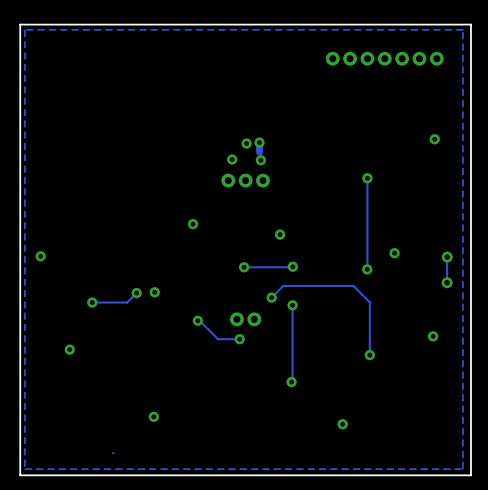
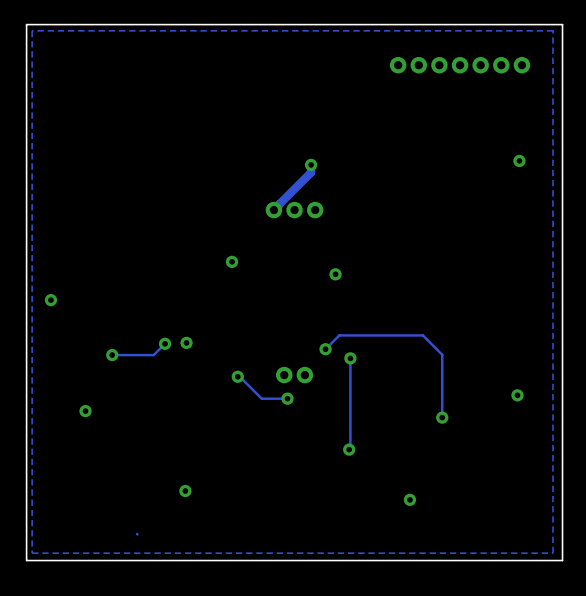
via: (246, 143) -> none
track: (259, 149) (259, 152) -> (311, 172) (273, 210)
via: (232, 159) -> none
via: (260, 160) -> none
track: (367, 178) (367, 269) -> none
via: (367, 178) -> none
via: (394, 253) -> none
track: (447, 257) (447, 282) -> none
via: (447, 257) -> none
track: (292, 266) (244, 267) -> none
via: (292, 266) -> none
via: (244, 267) -> none
via: (367, 269) -> none
via: (447, 282) -> none

